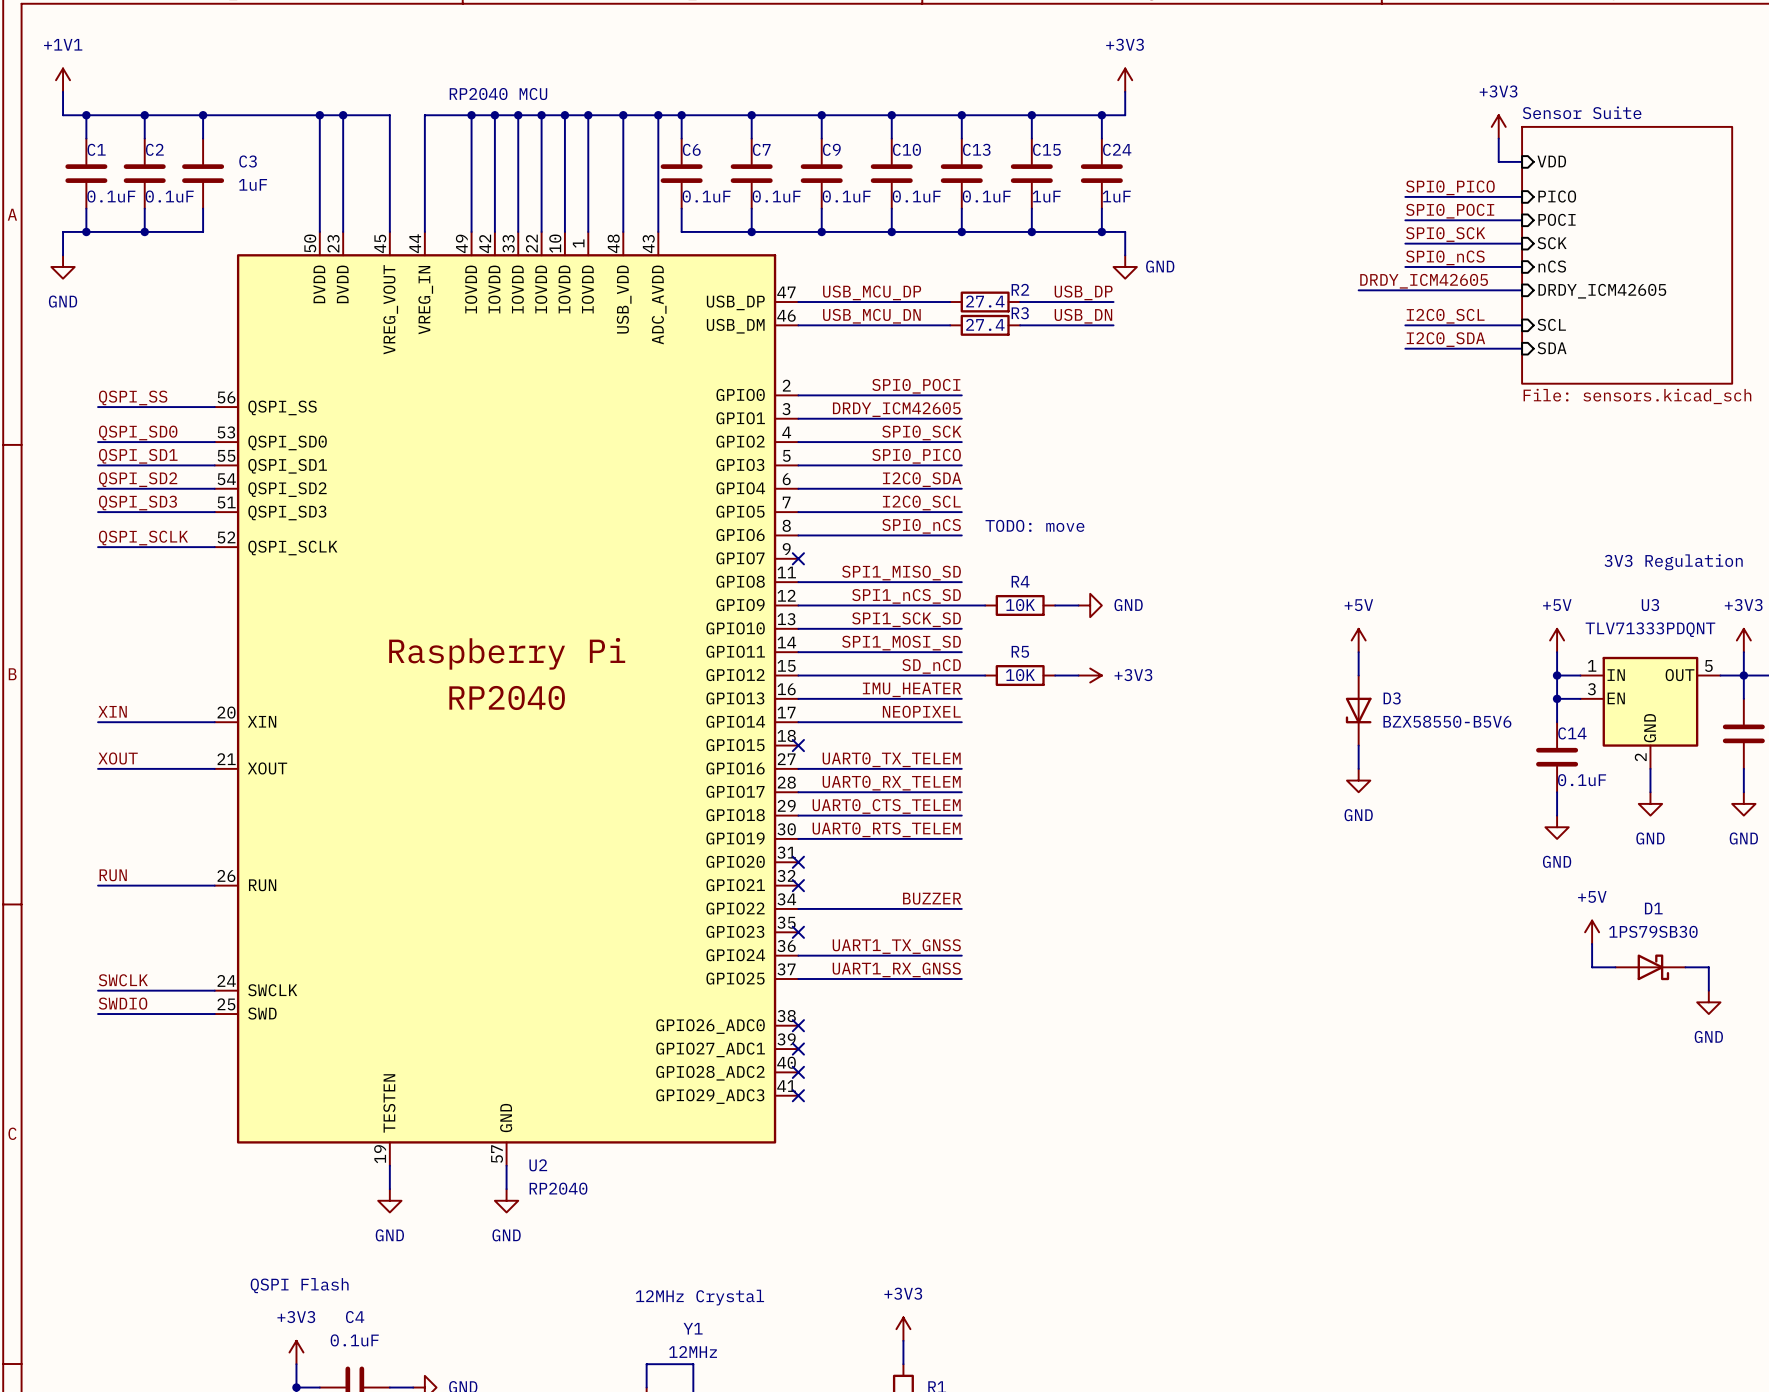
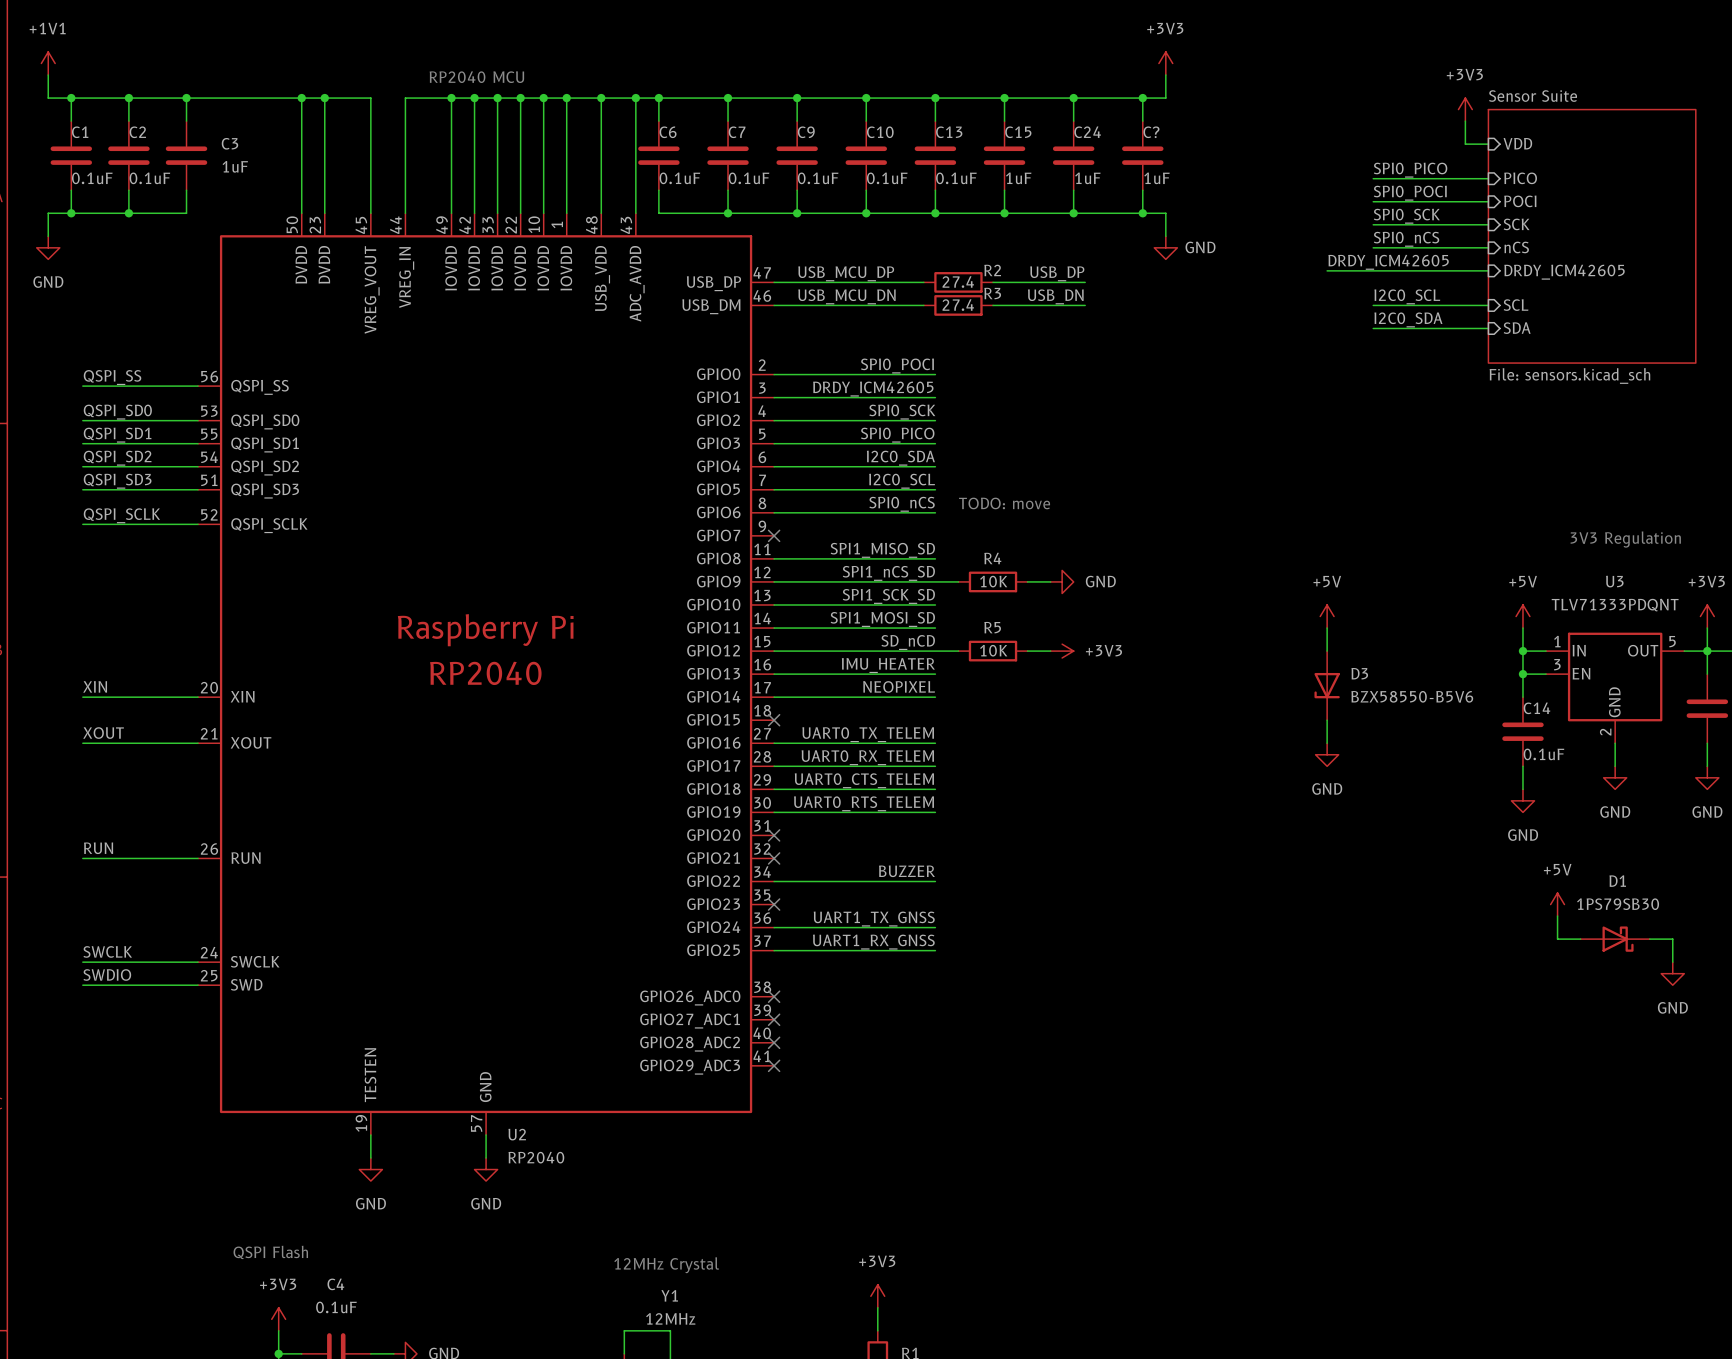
power symbol position: +3V3 (1125, 80) -> +3V3 (1165, 63)
wire: (1125, 91) (1125, 115) -> (1165, 75) (1165, 98) (1096, 98)
wire: none -> (1142, 98) (1142, 121)
junction: none -> (1142, 98)
C?: none -> 1uF (1142, 155)
wire: none -> (1142, 190) (1142, 213)
wire: (1125, 231) (1125, 255) -> (1096, 213) (1165, 213) (1165, 236)
junction: none -> (1142, 213)
power symbol position: GND (1125, 266) -> GND (1165, 247)

